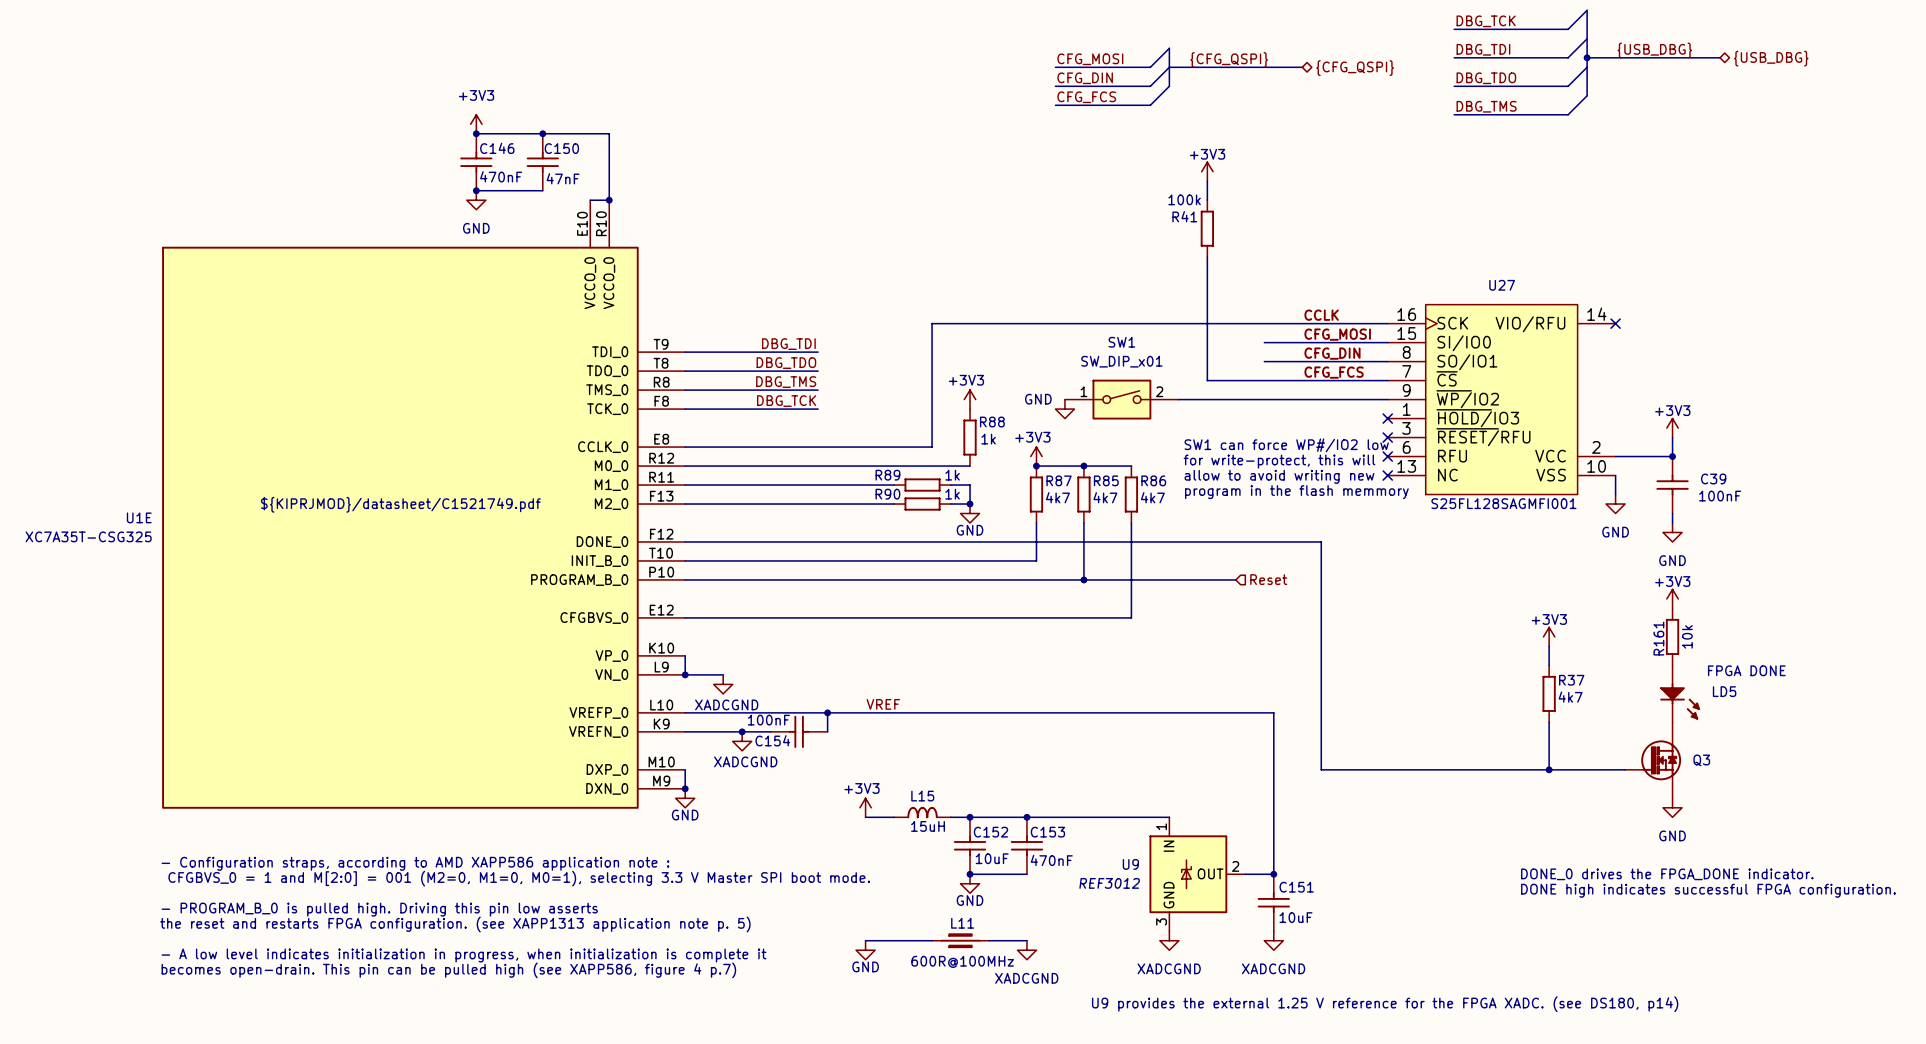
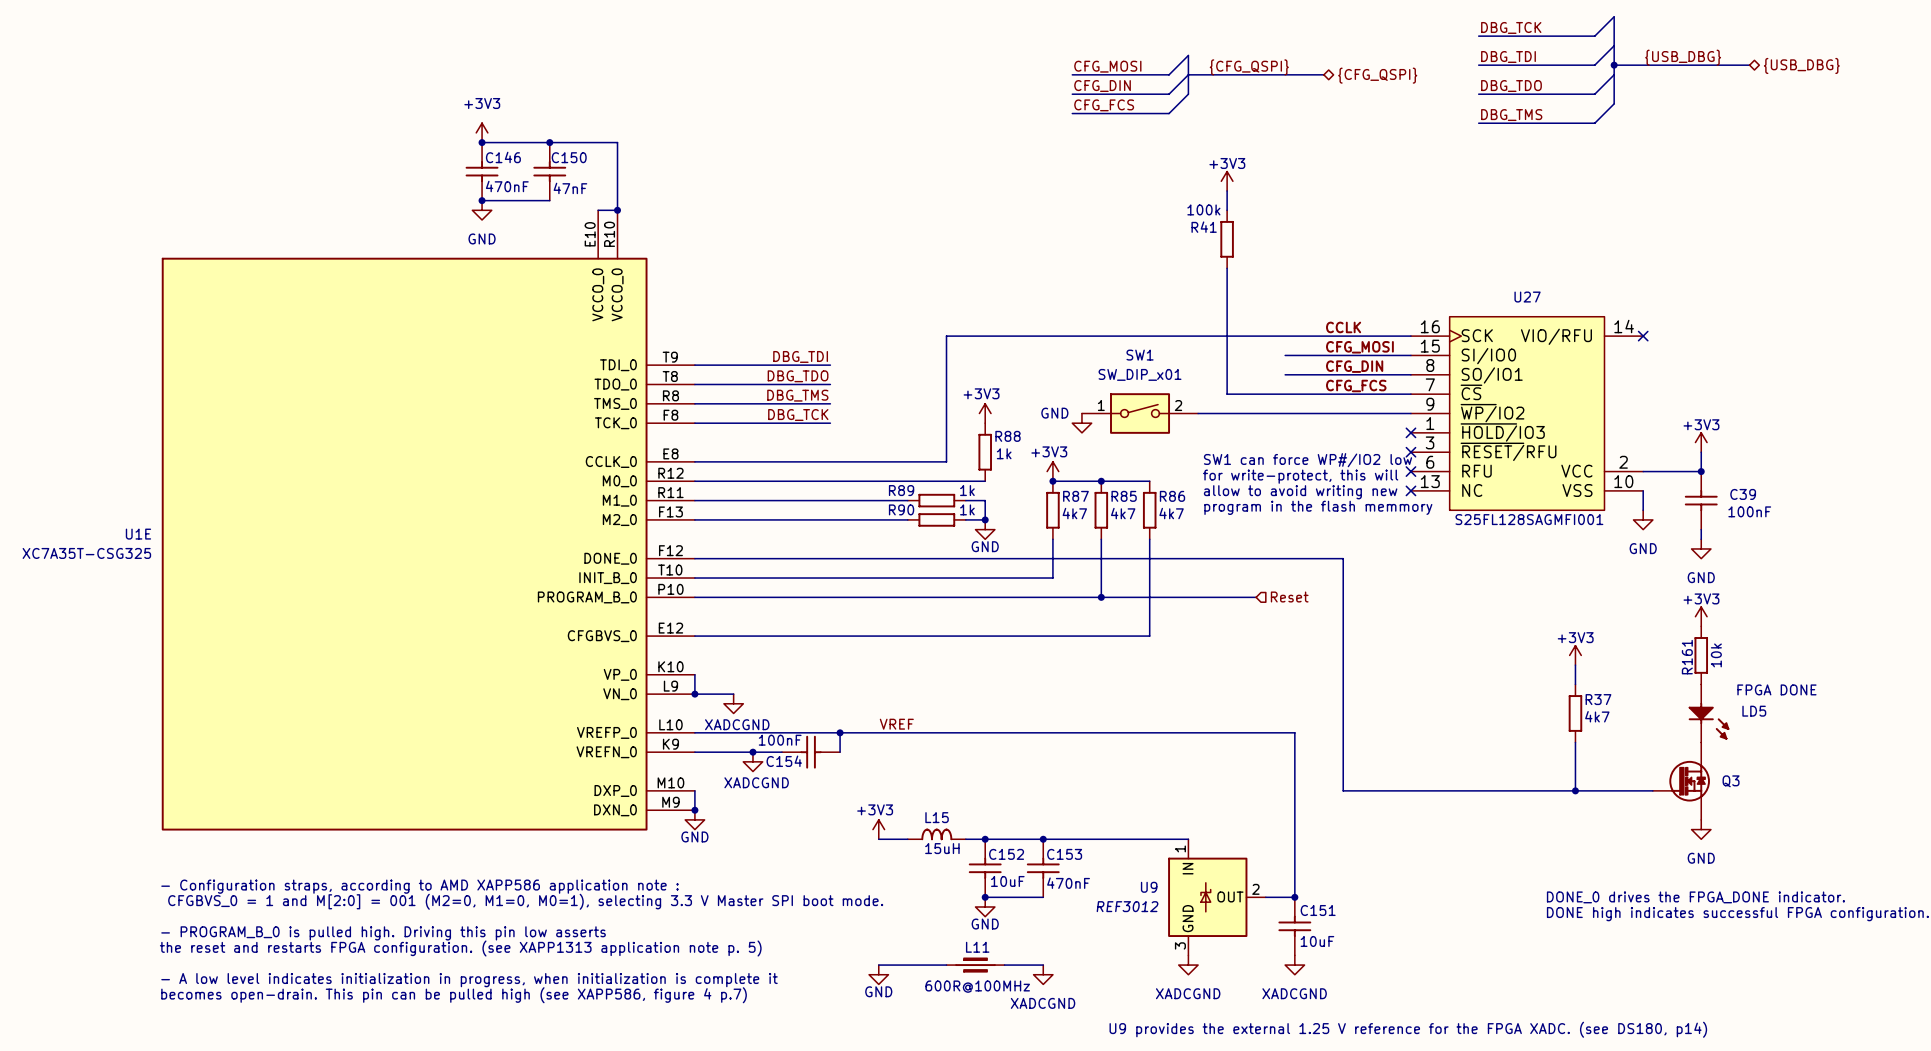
U1E text: ${KIPRJMOD}/datasheet/C1521749.pdf (400, 504) -> none

